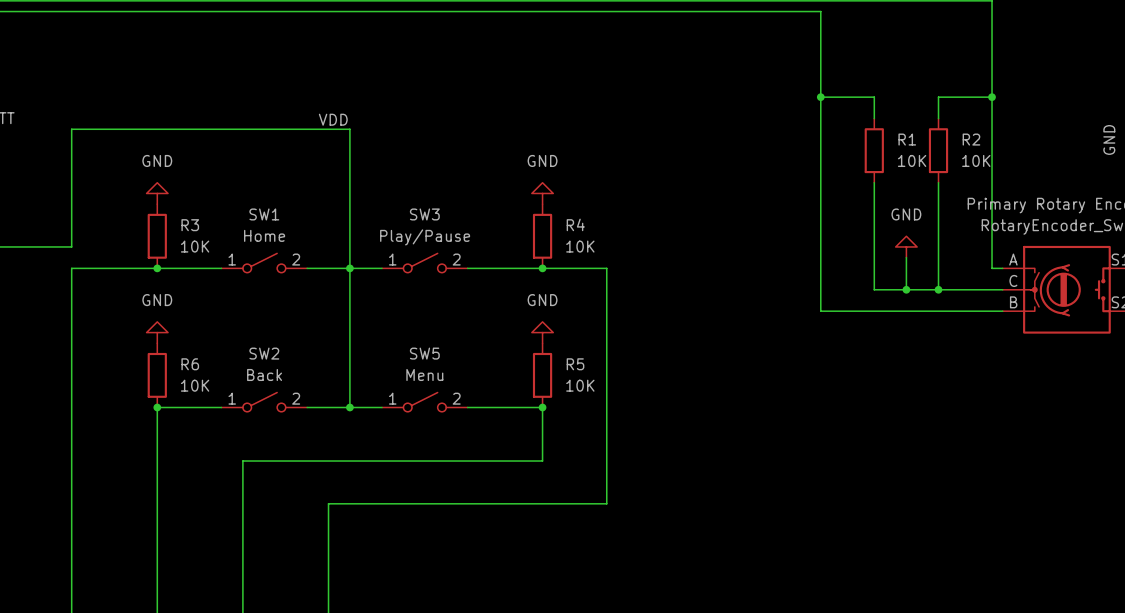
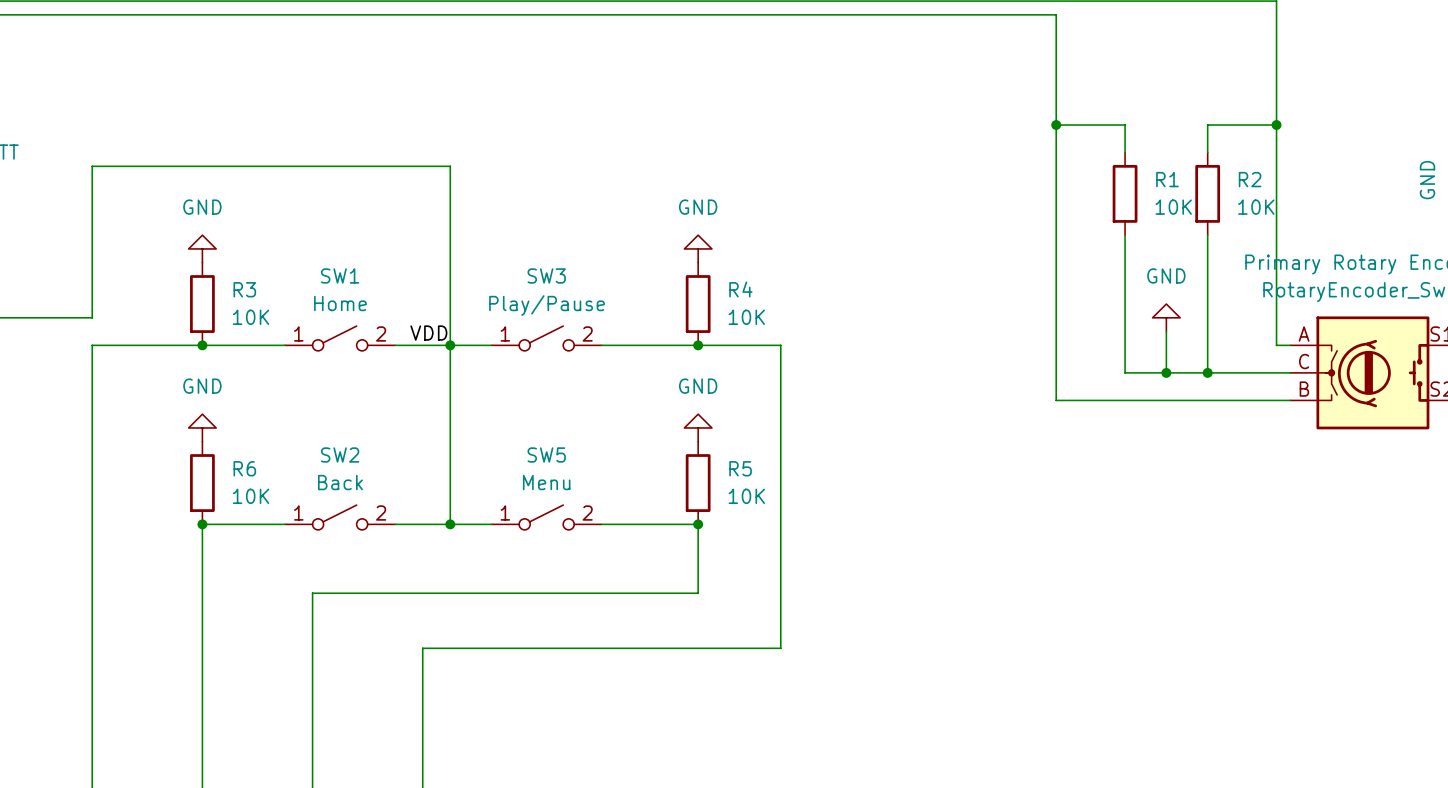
label position: VDD (333, 119) -> VDD (428, 333)

